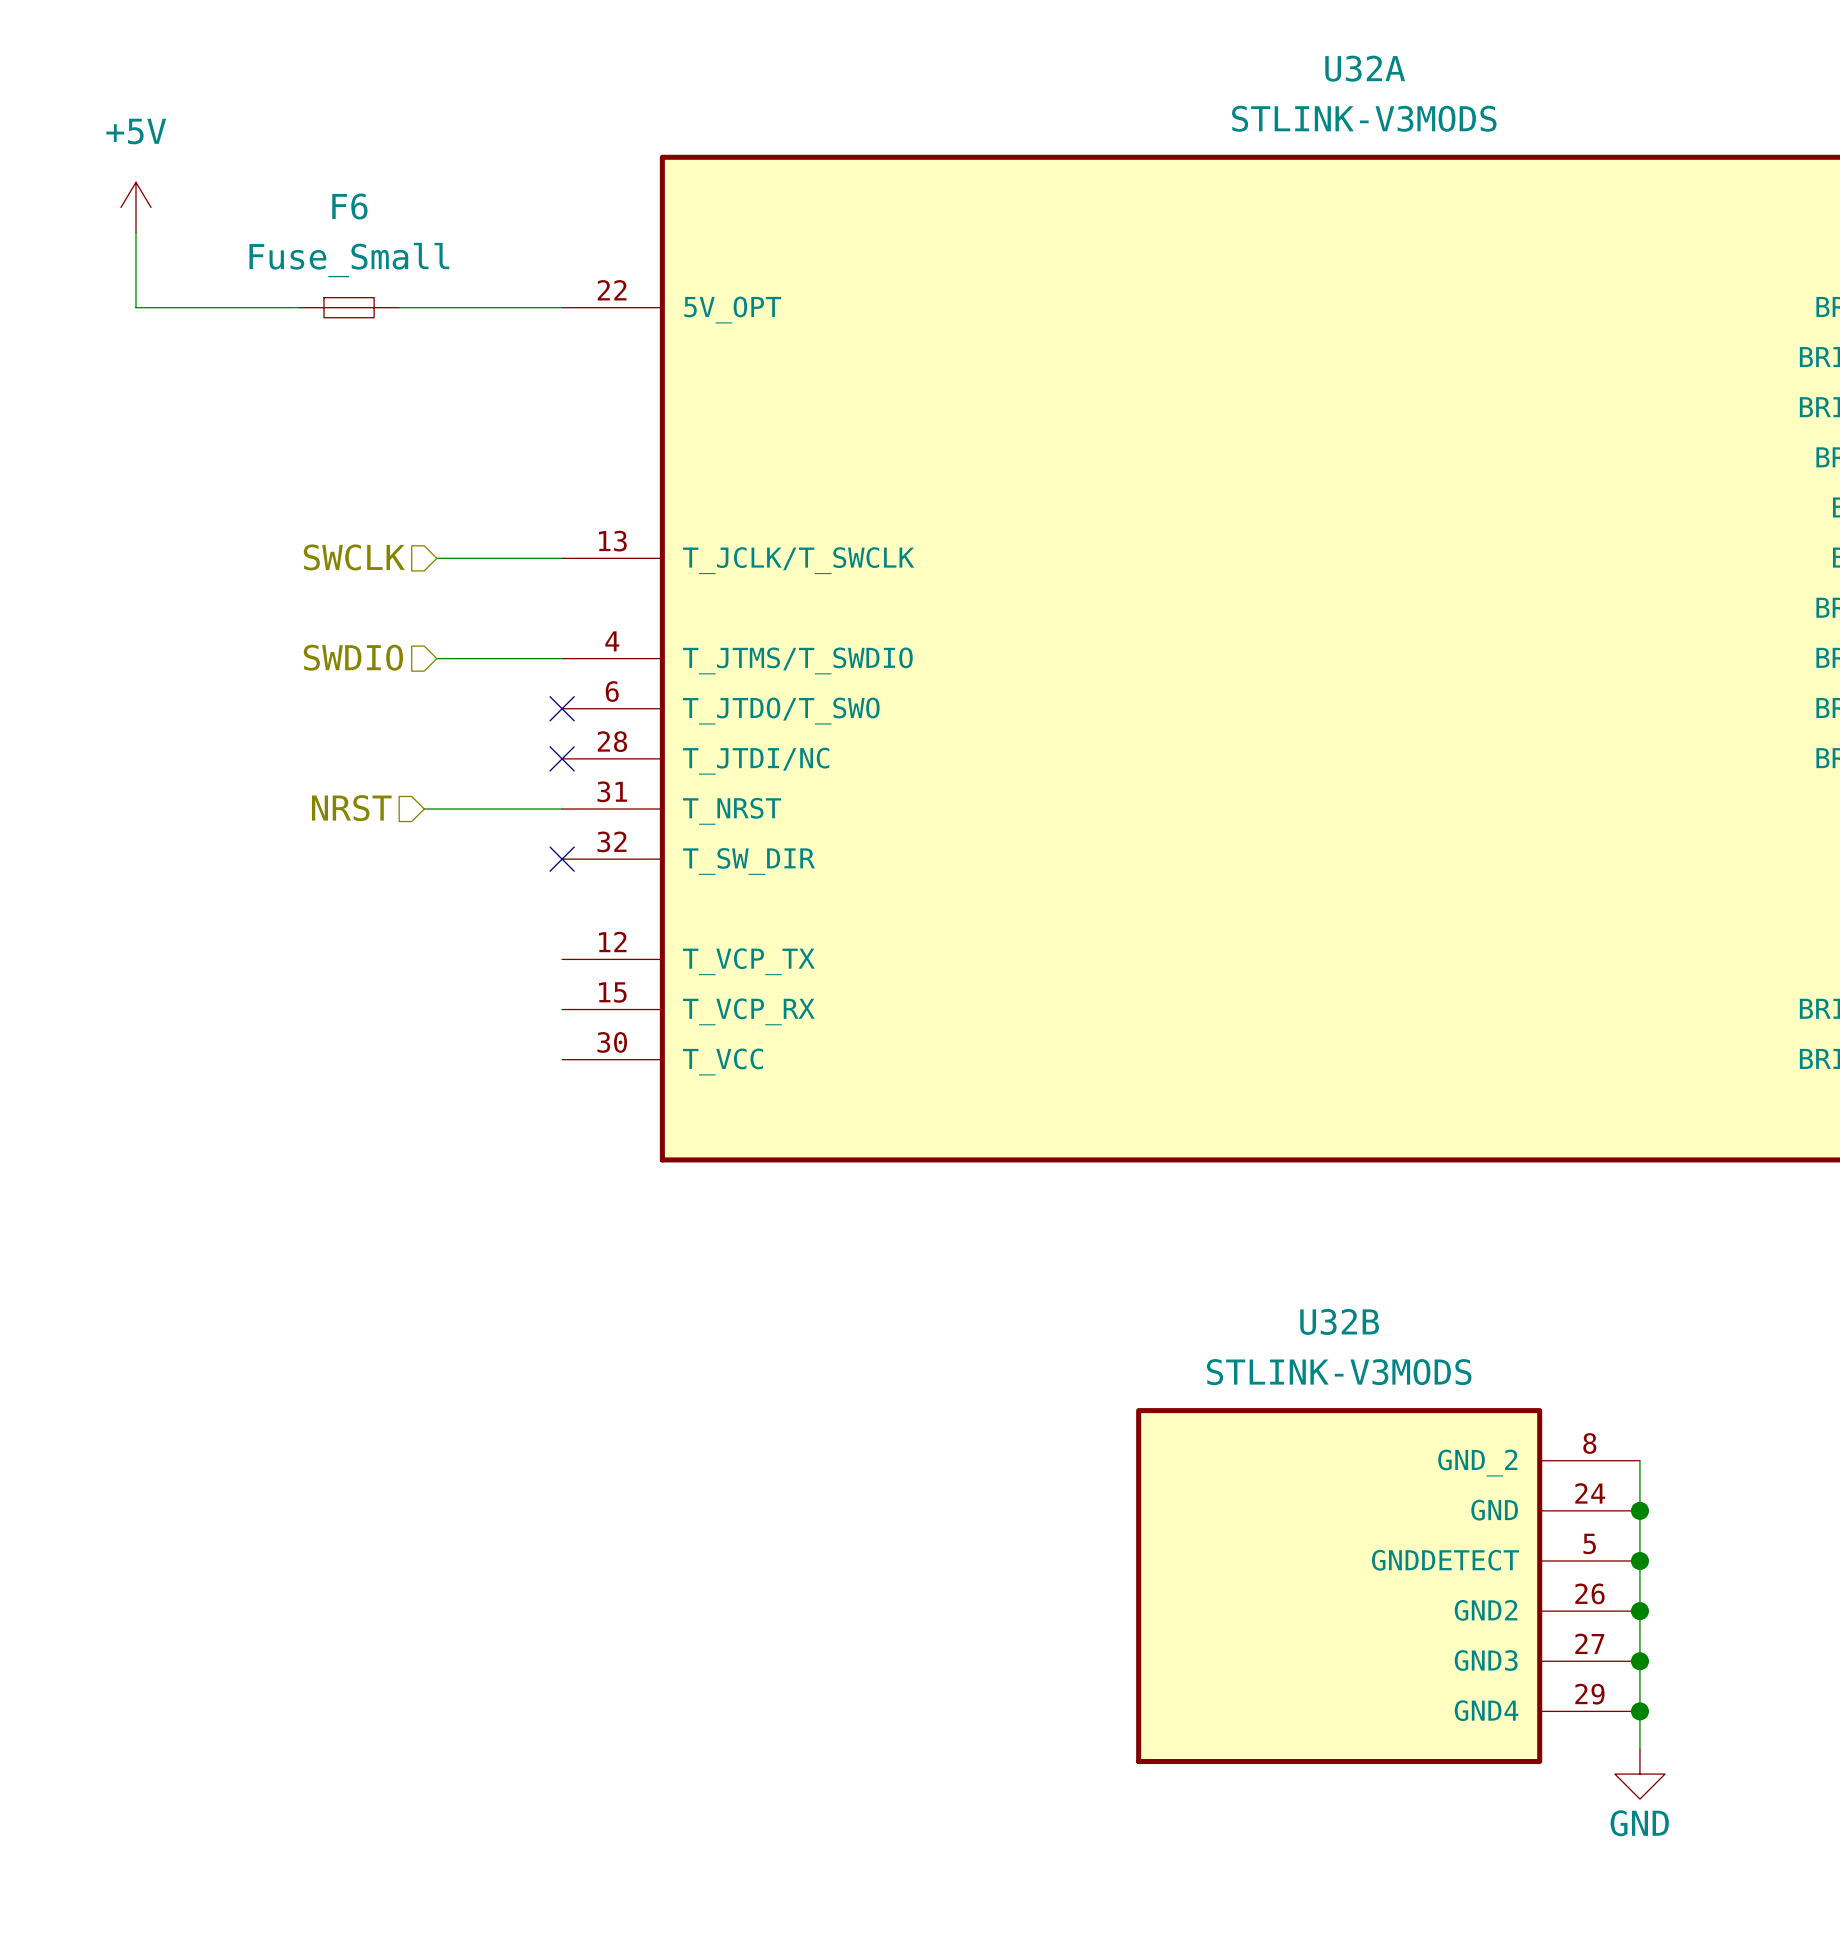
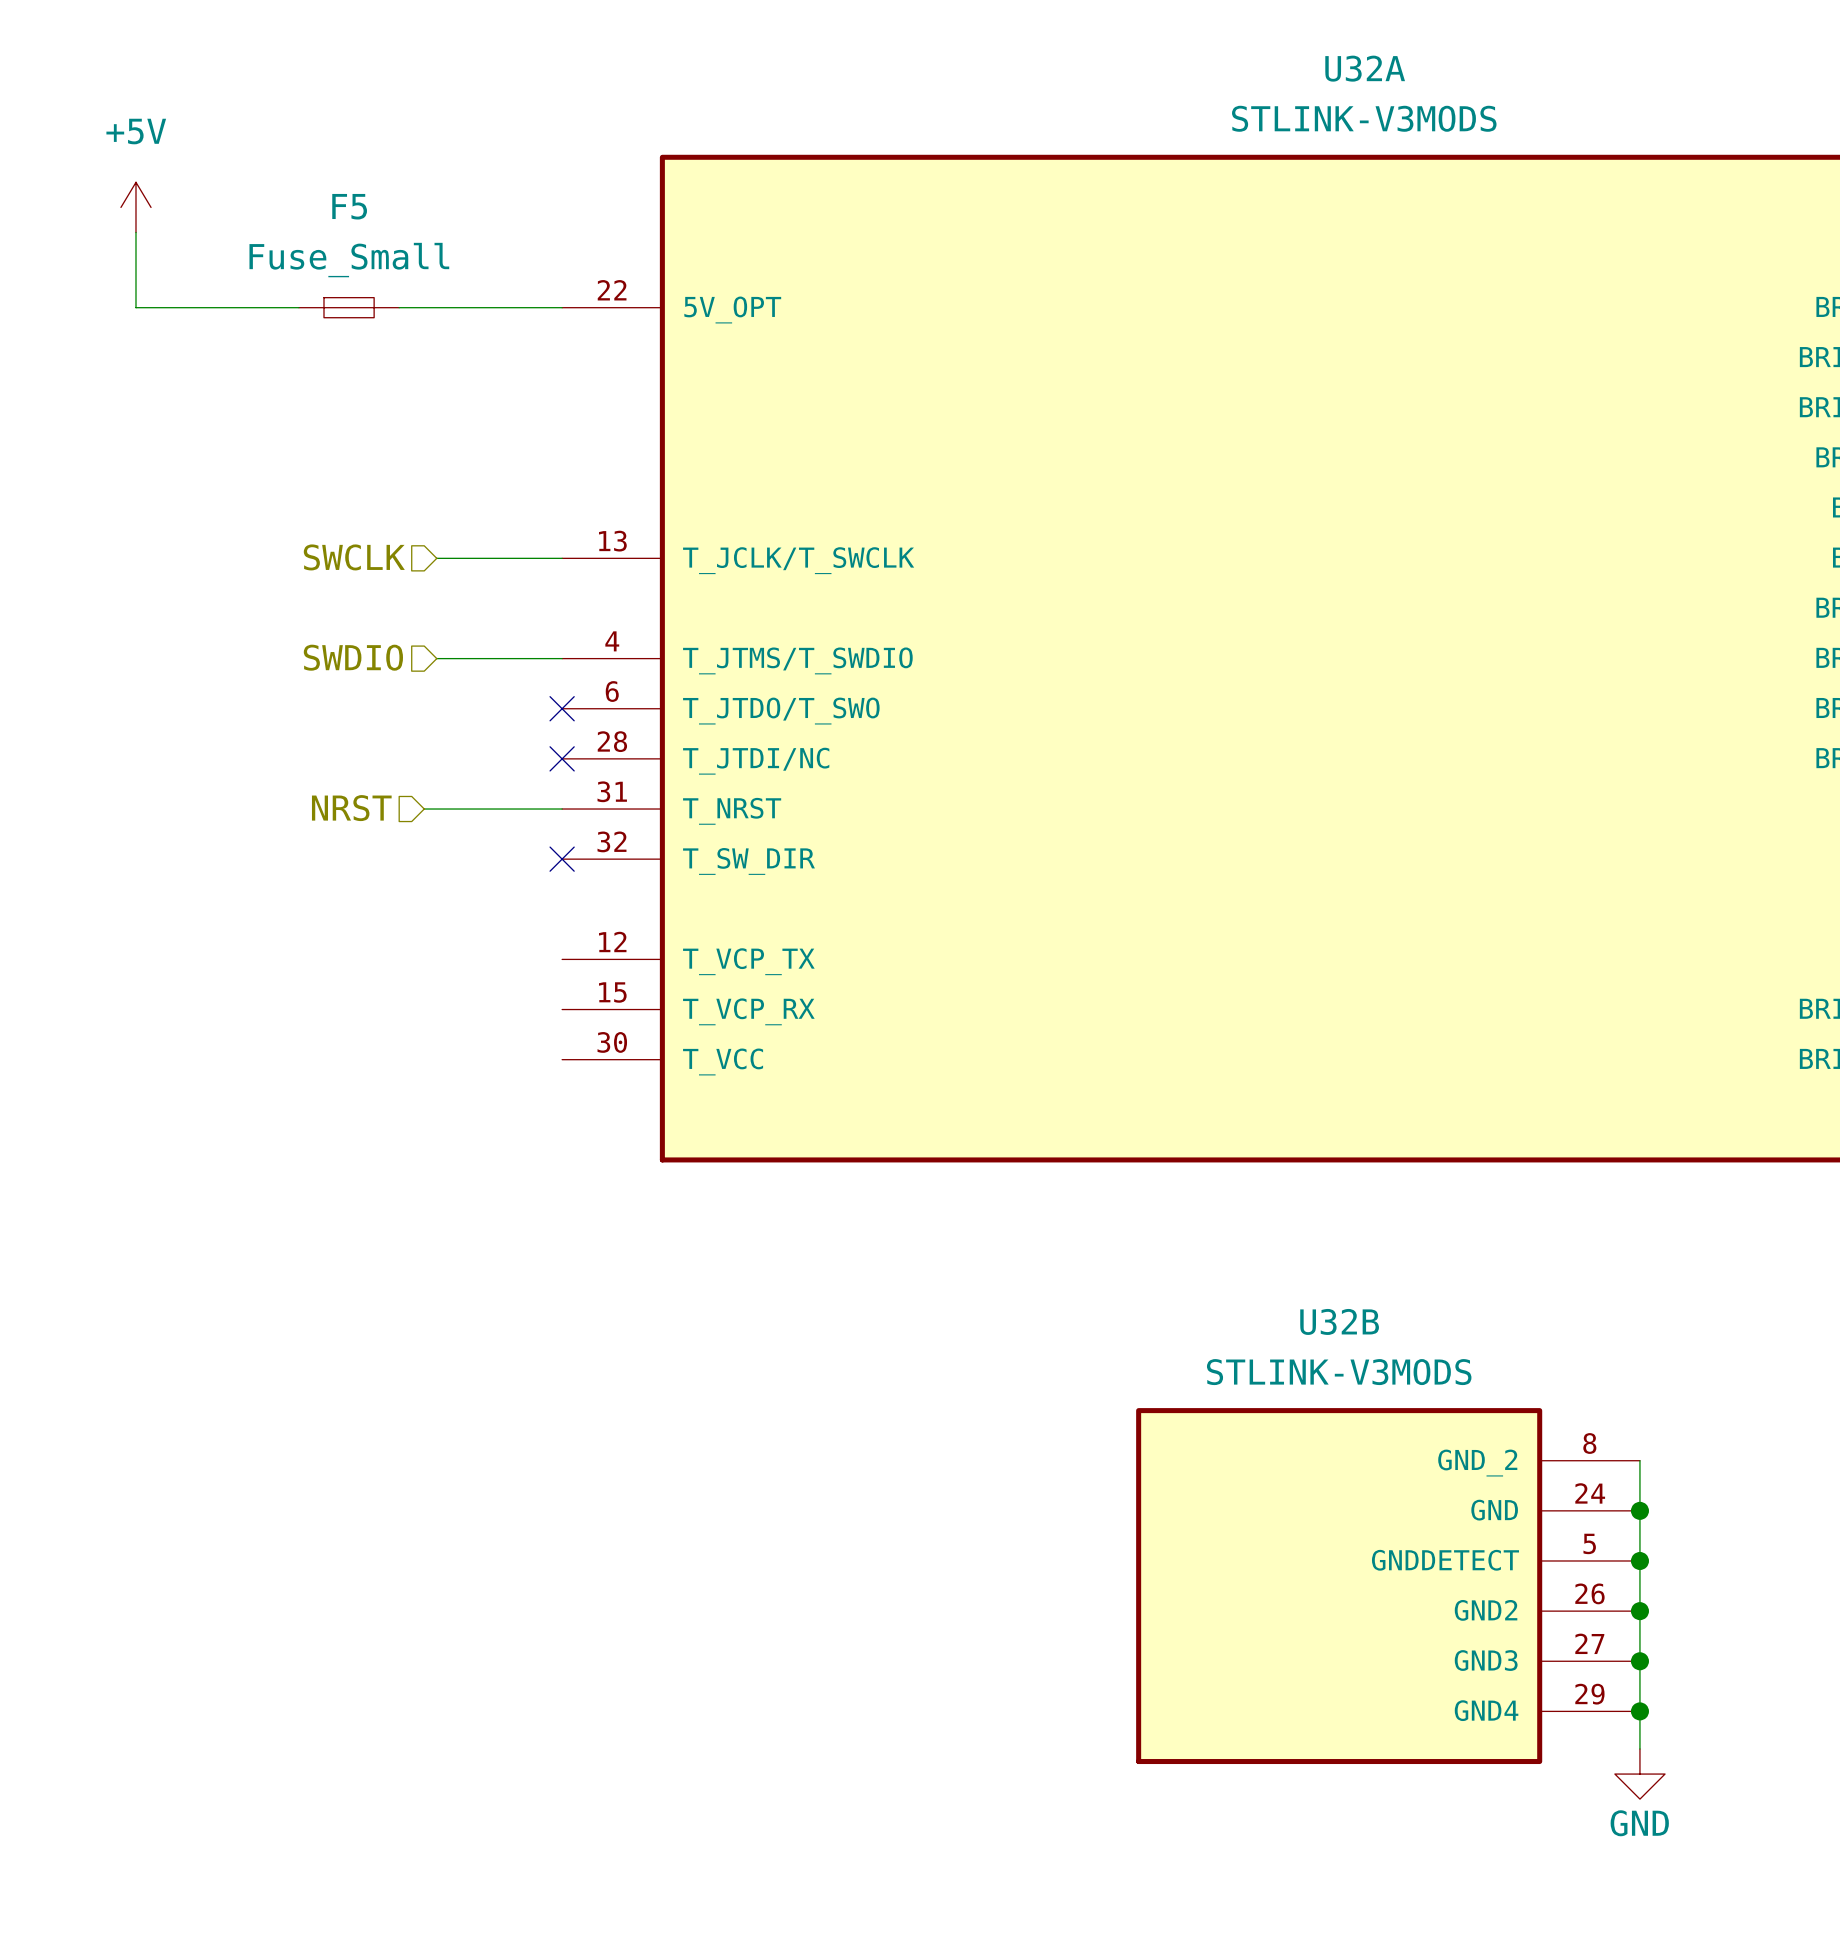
F6 name: F6 (349, 206) -> F5 (349, 206)

